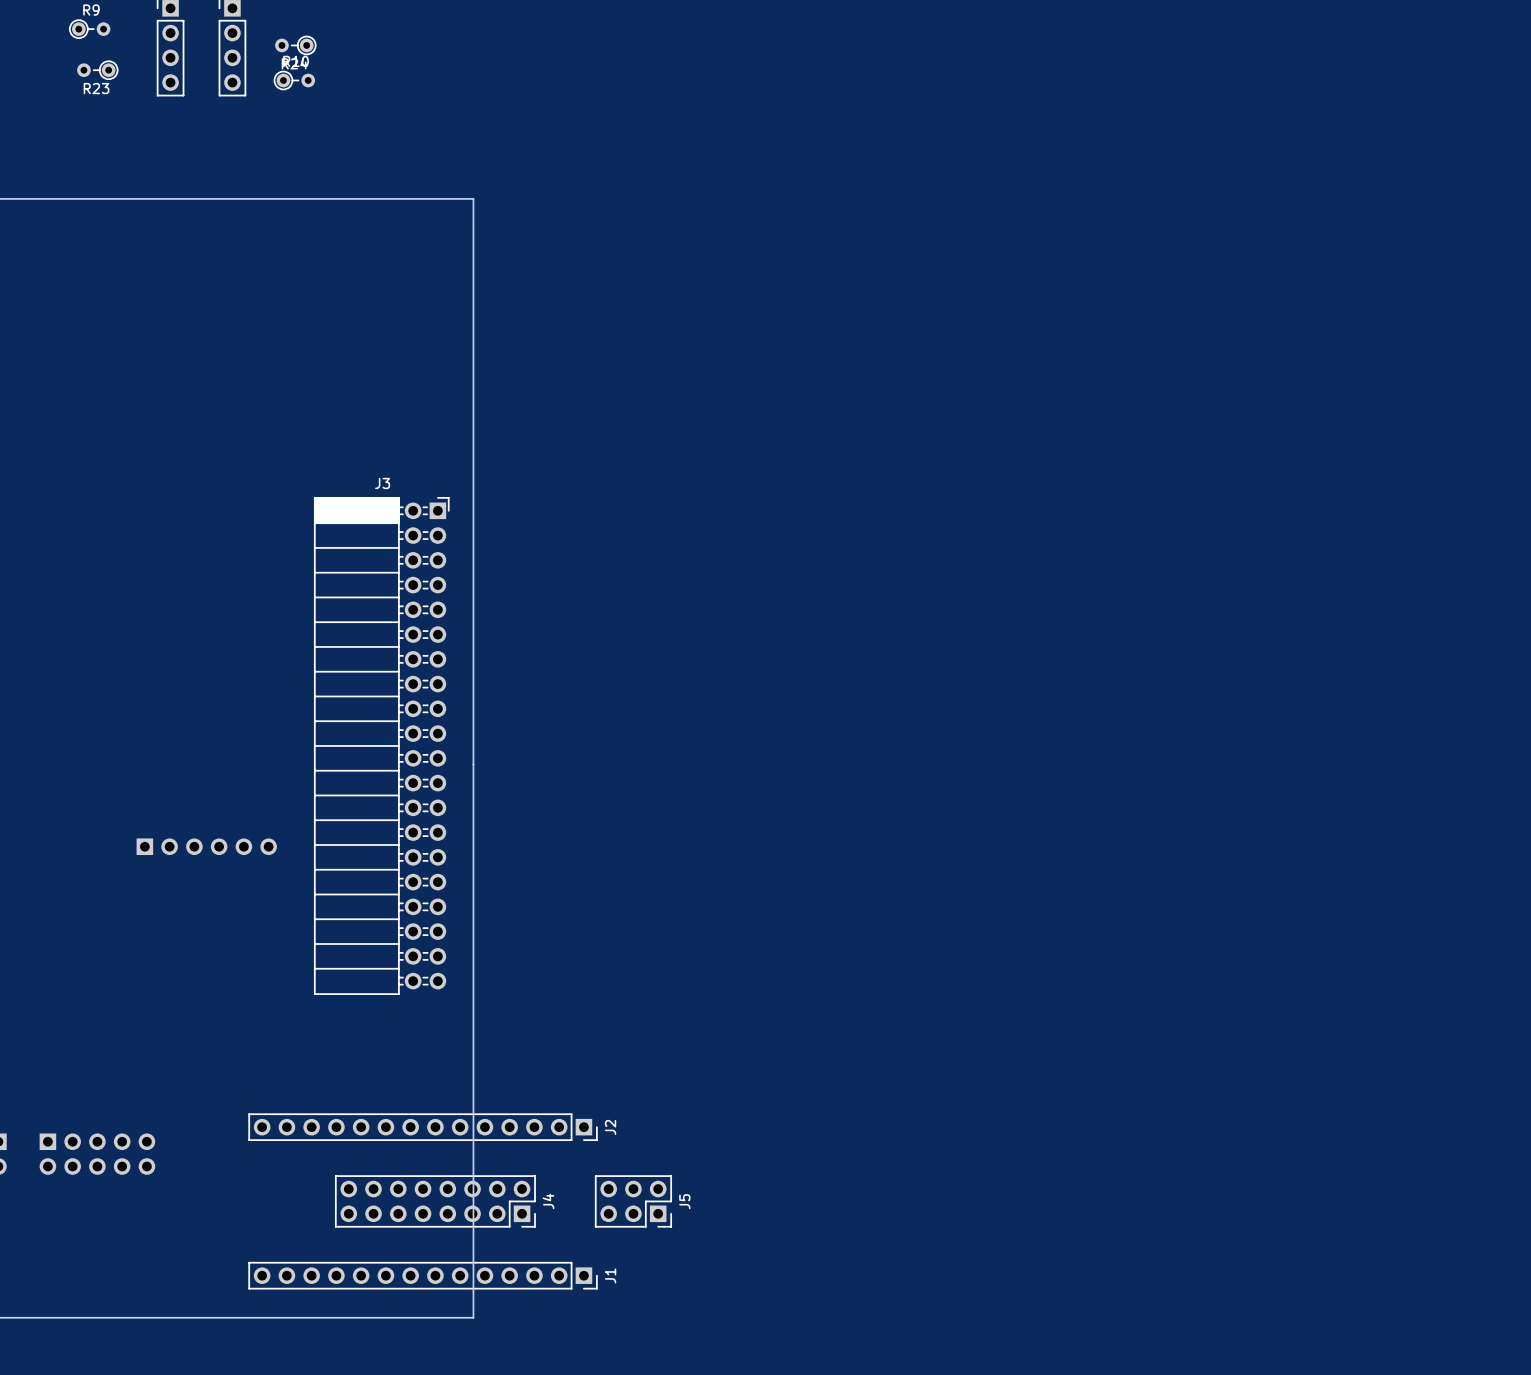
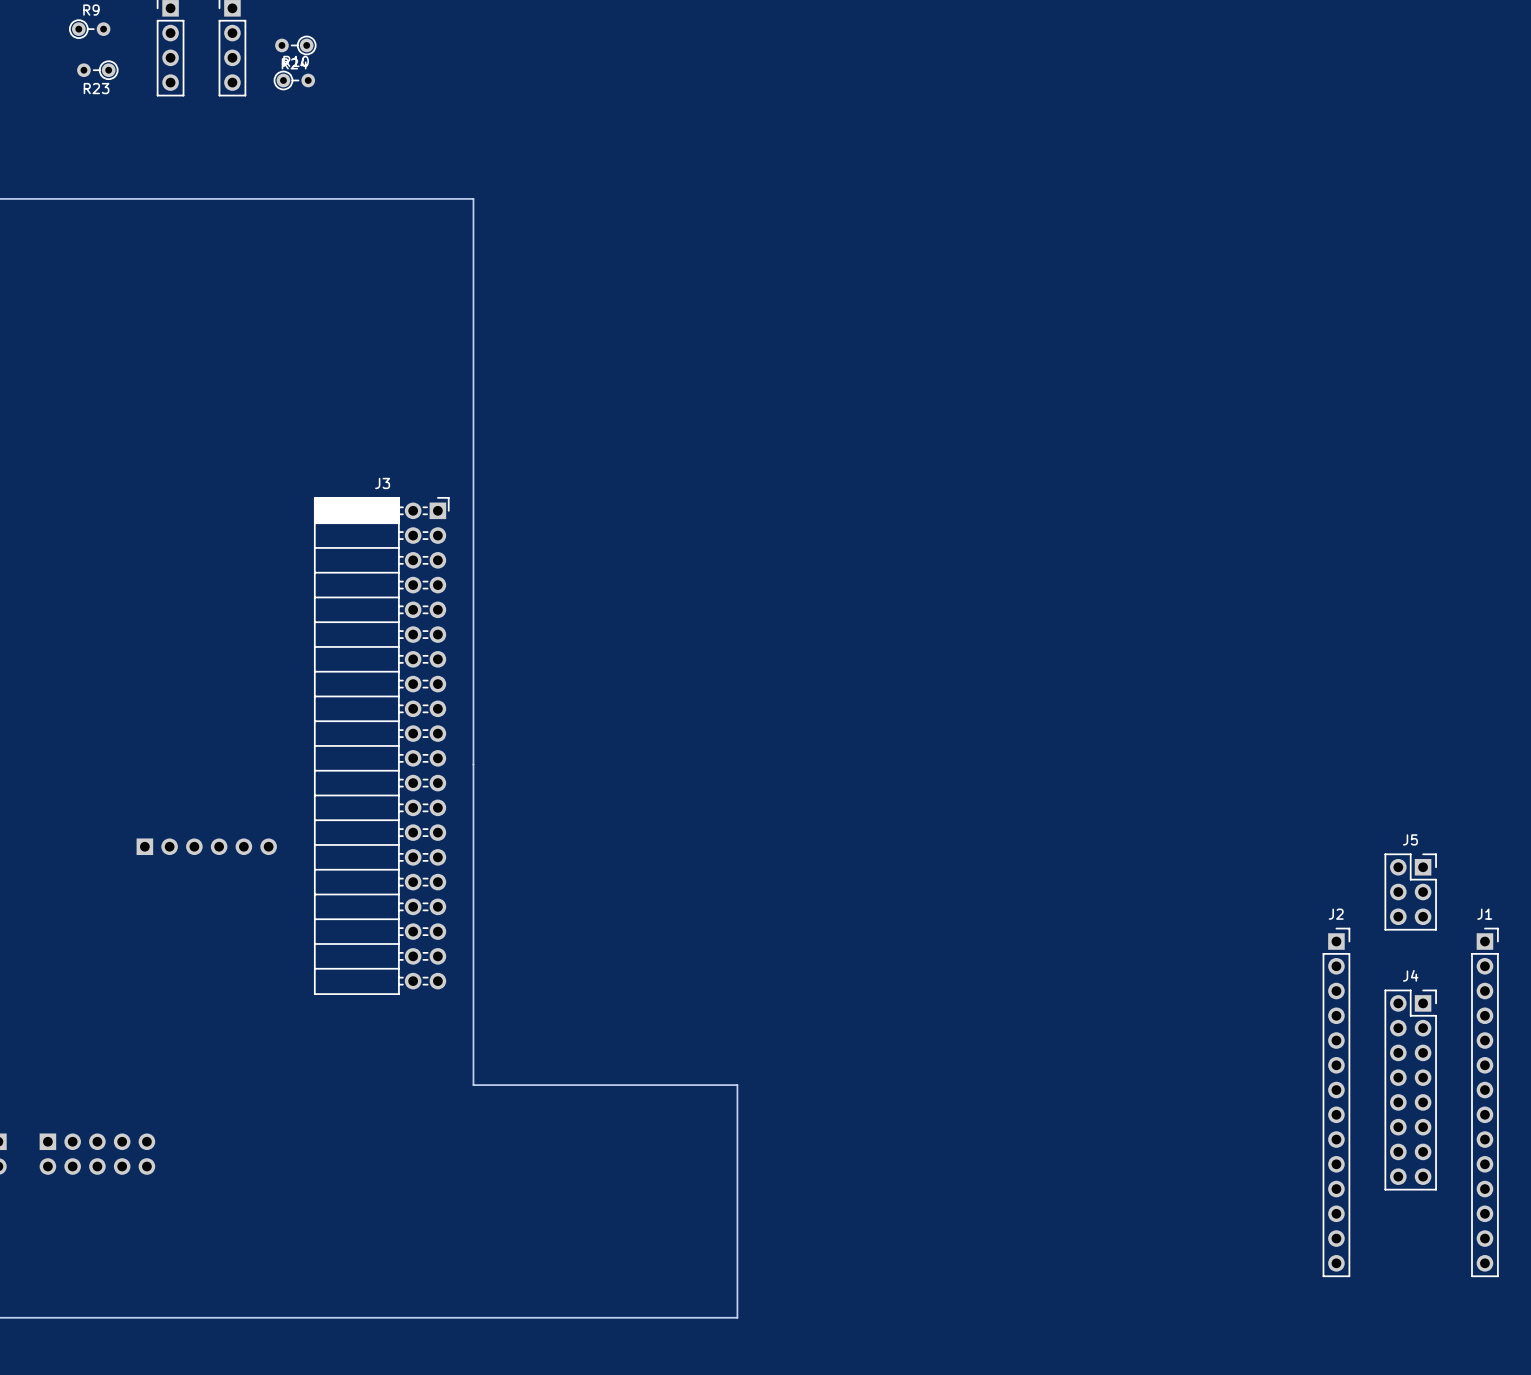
board edge: (473, 1085) (473, 1317) -> (473, 1085) (737, 1085) (737, 1317) (473, 1317)
J2 rotation: 0° (423, 1127) -> 90° counterclockwise (1336, 1102)
J2 position: (423, 1127) -> (1336, 1102)
J4 rotation: 0° (435, 1201) -> 90° counterclockwise (1410, 1090)
J4 position: (435, 1201) -> (1410, 1090)
J5 rotation: 0° (633, 1201) -> 90° counterclockwise (1410, 892)
J5 position: (633, 1201) -> (1410, 892)
J1 rotation: 0° (423, 1275) -> 90° counterclockwise (1484, 1102)
J1 position: (423, 1275) -> (1484, 1102)

